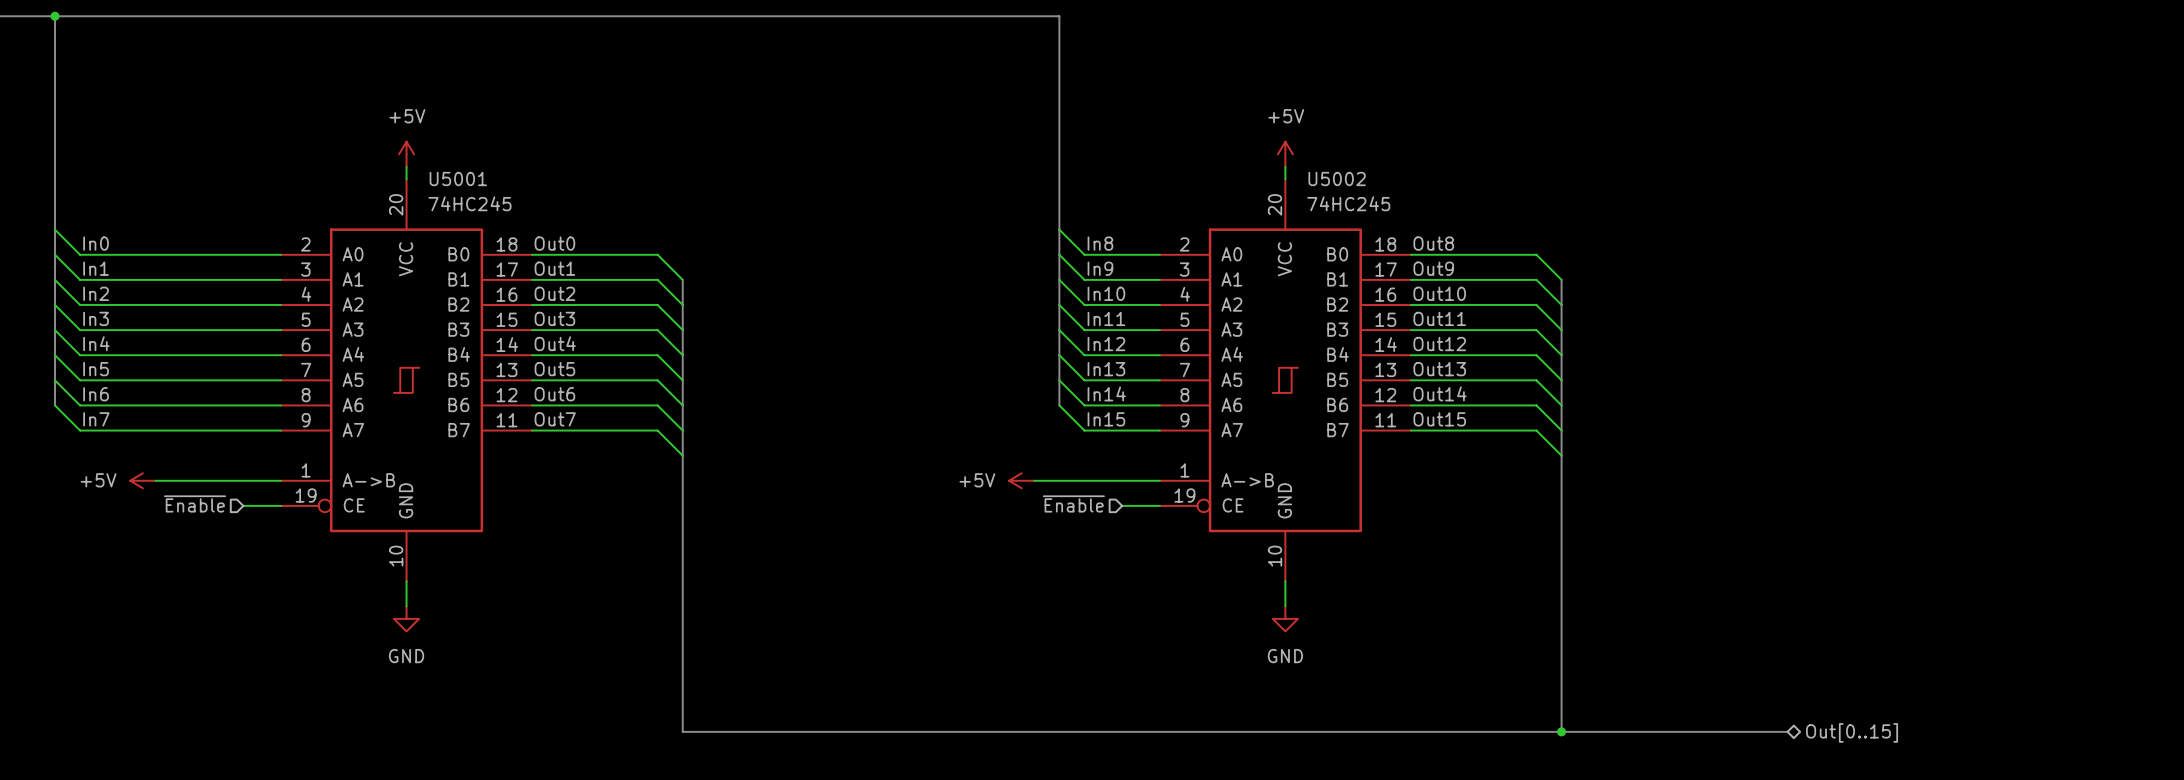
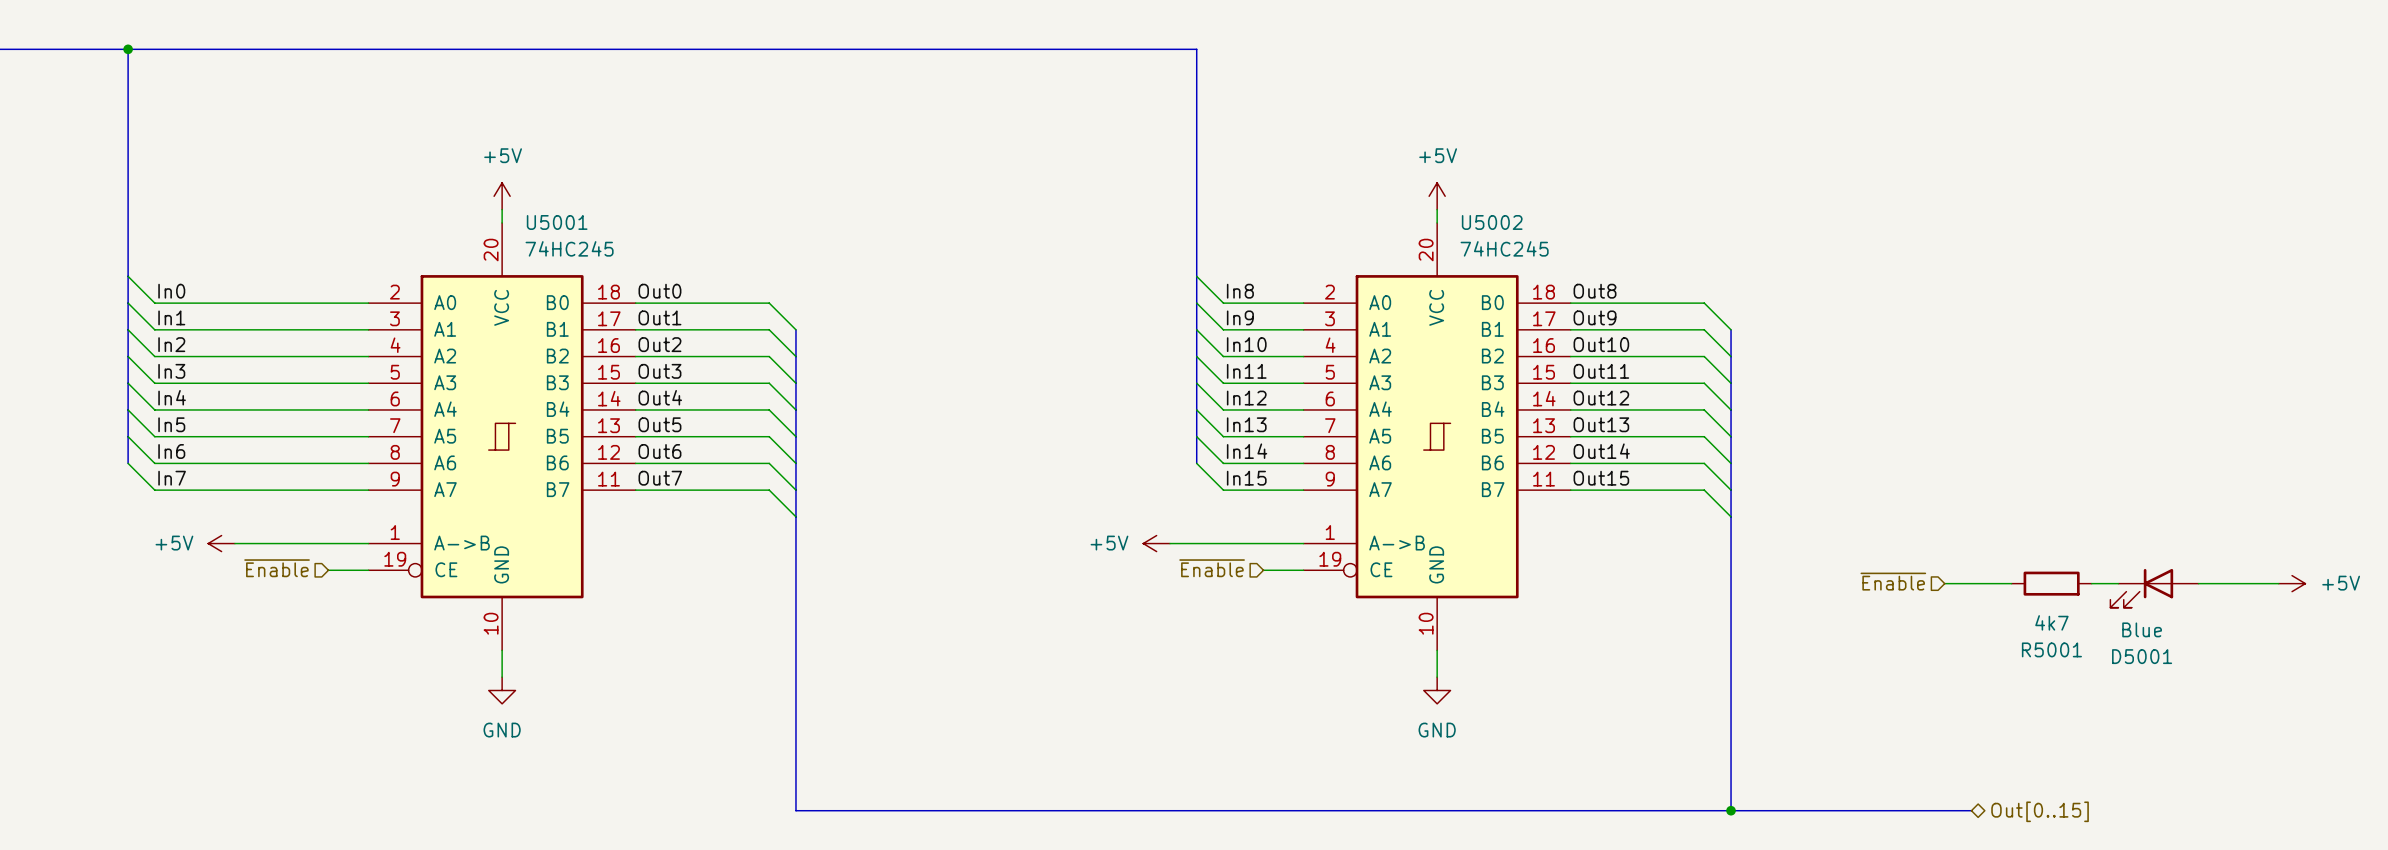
hierarchical label: none -> ~{Enable} (1893, 581)
wire: none -> (1944, 583) (2011, 583)
R5001: none -> 4k7 (2051, 583)
wire: none -> (2091, 583) (2118, 583)
wire: none -> (2198, 583) (2278, 583)
power symbol: none -> +5V (2292, 583)
D5001: none -> Blue (2154, 588)

